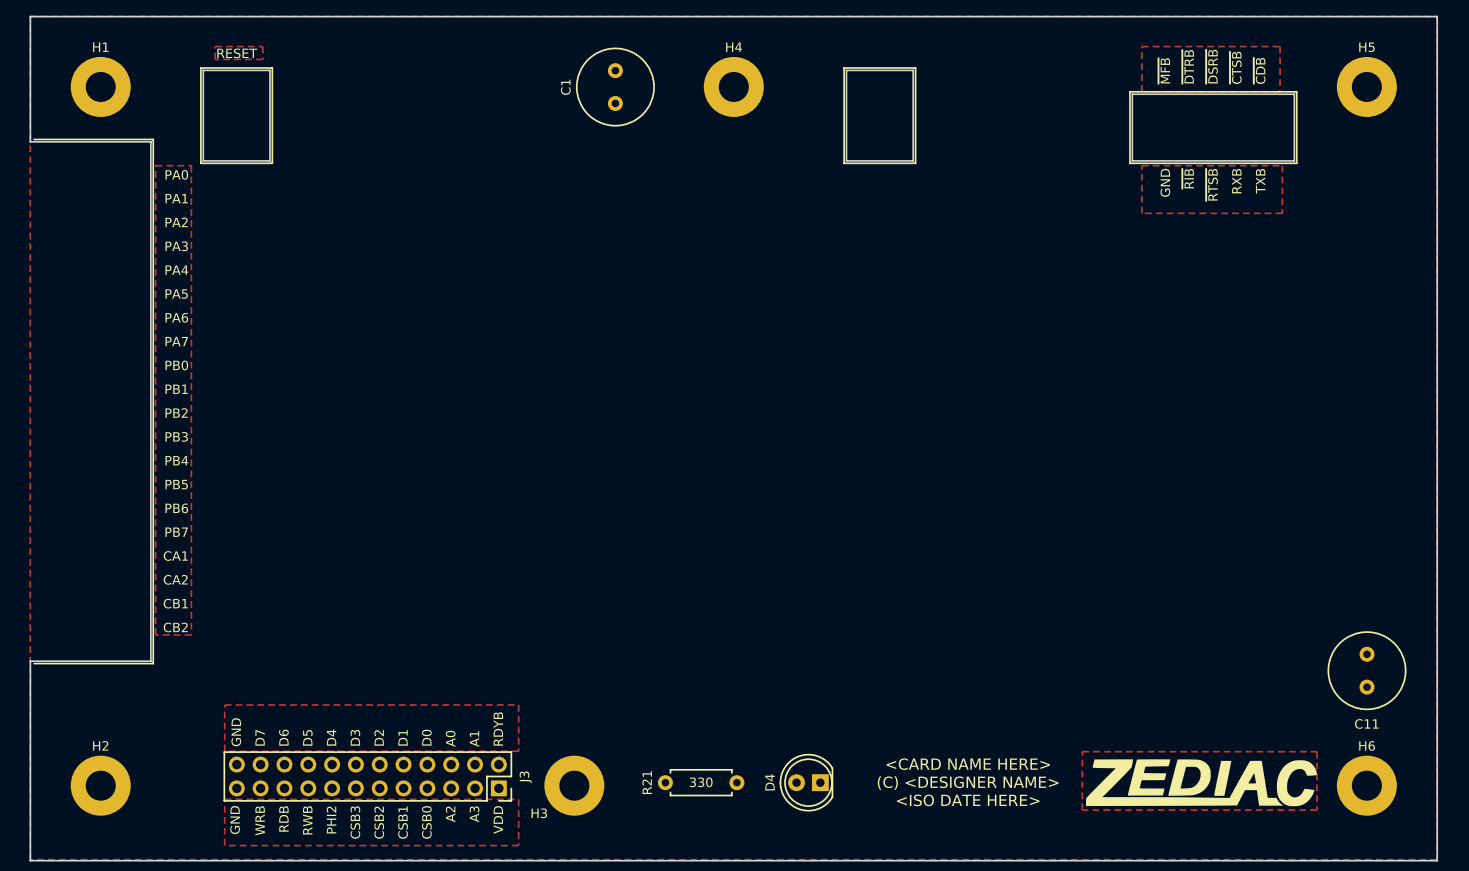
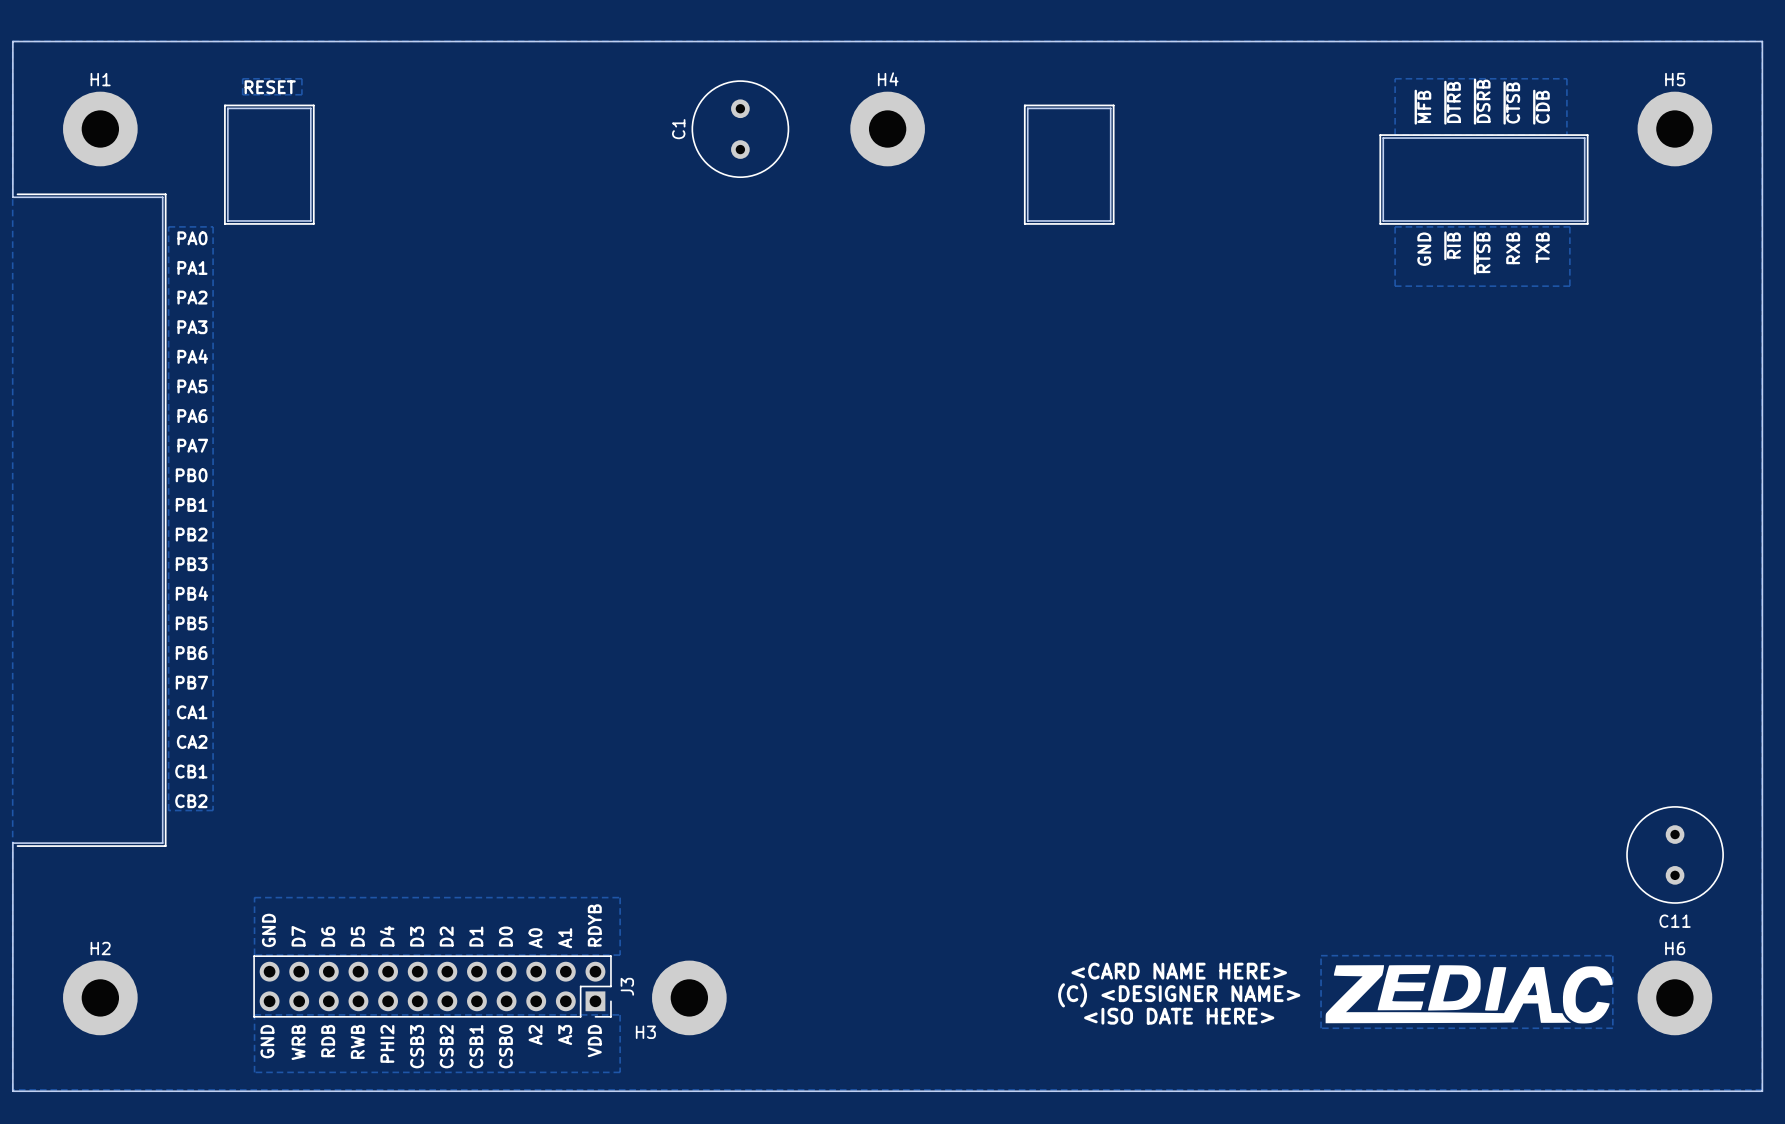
R21: 330 (701, 782) -> none
D4: (806, 782) -> none

